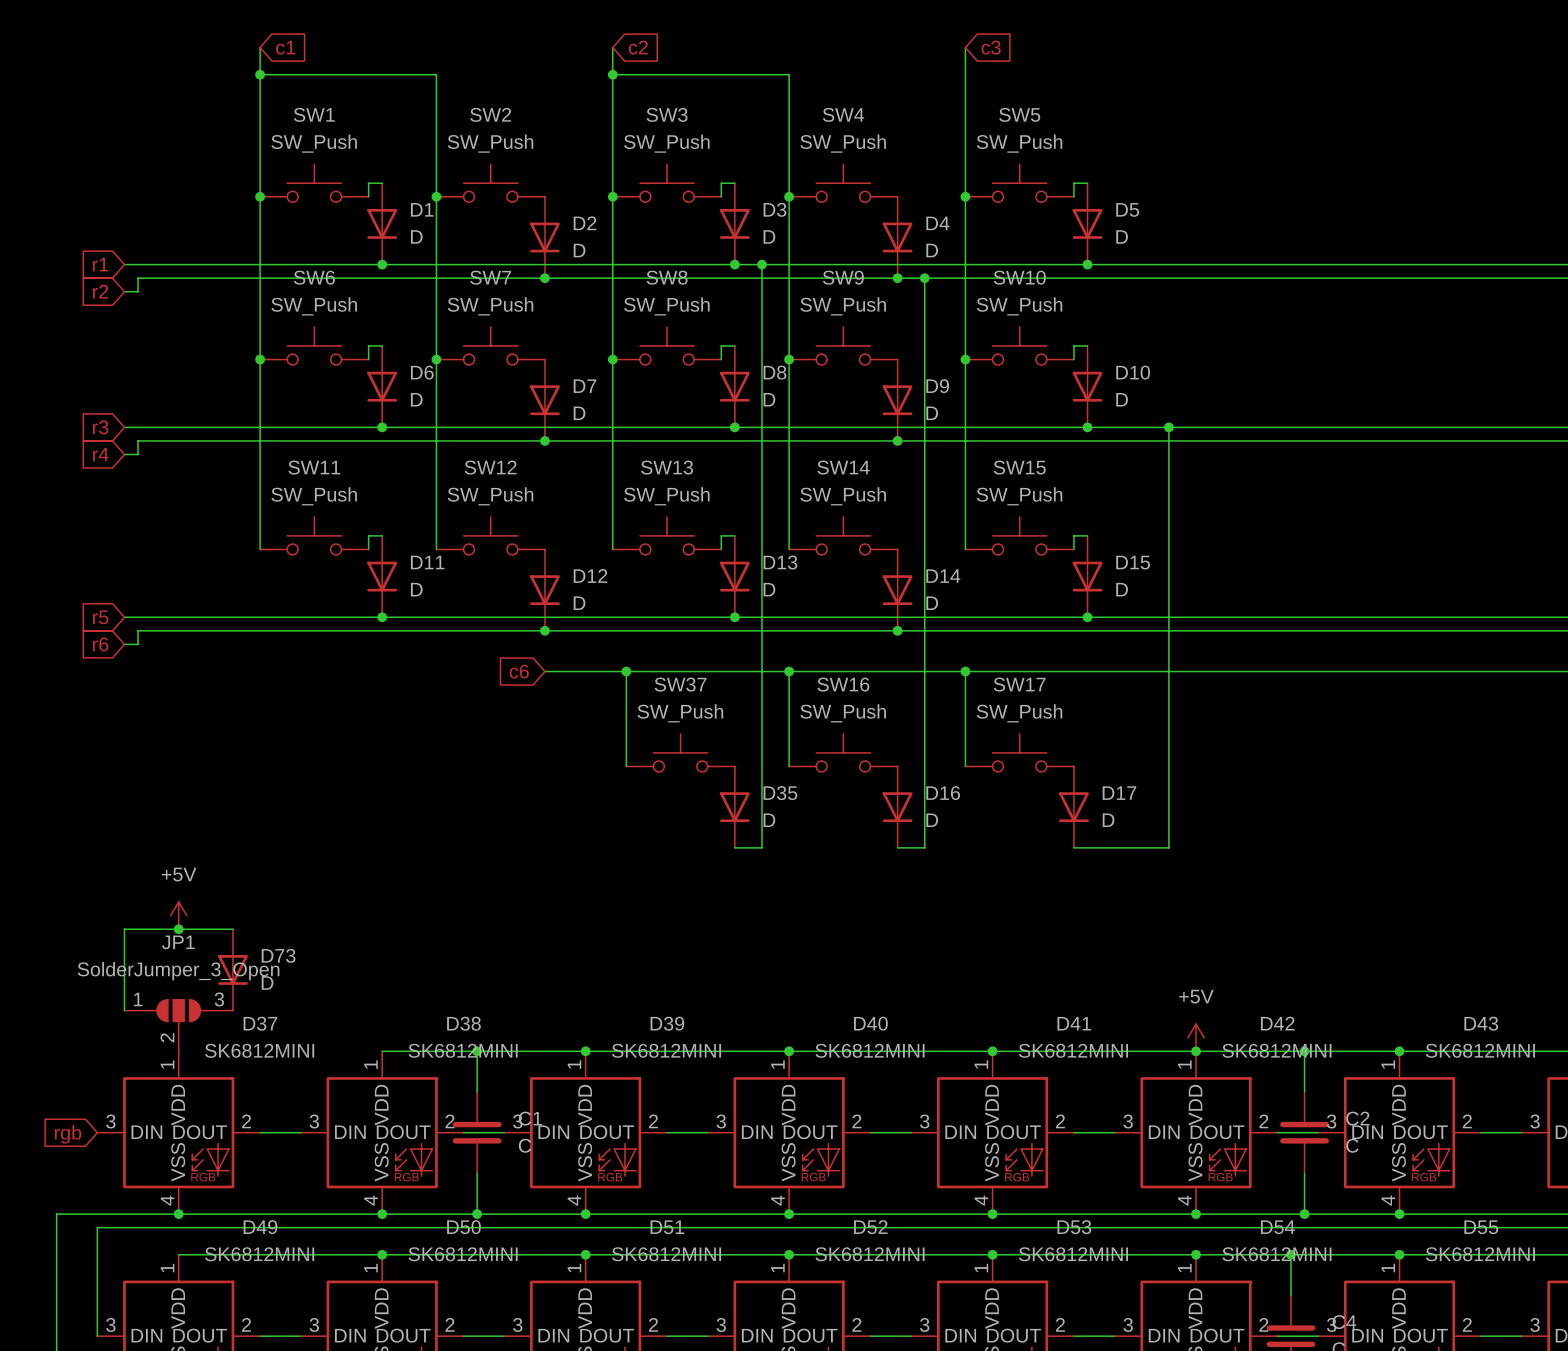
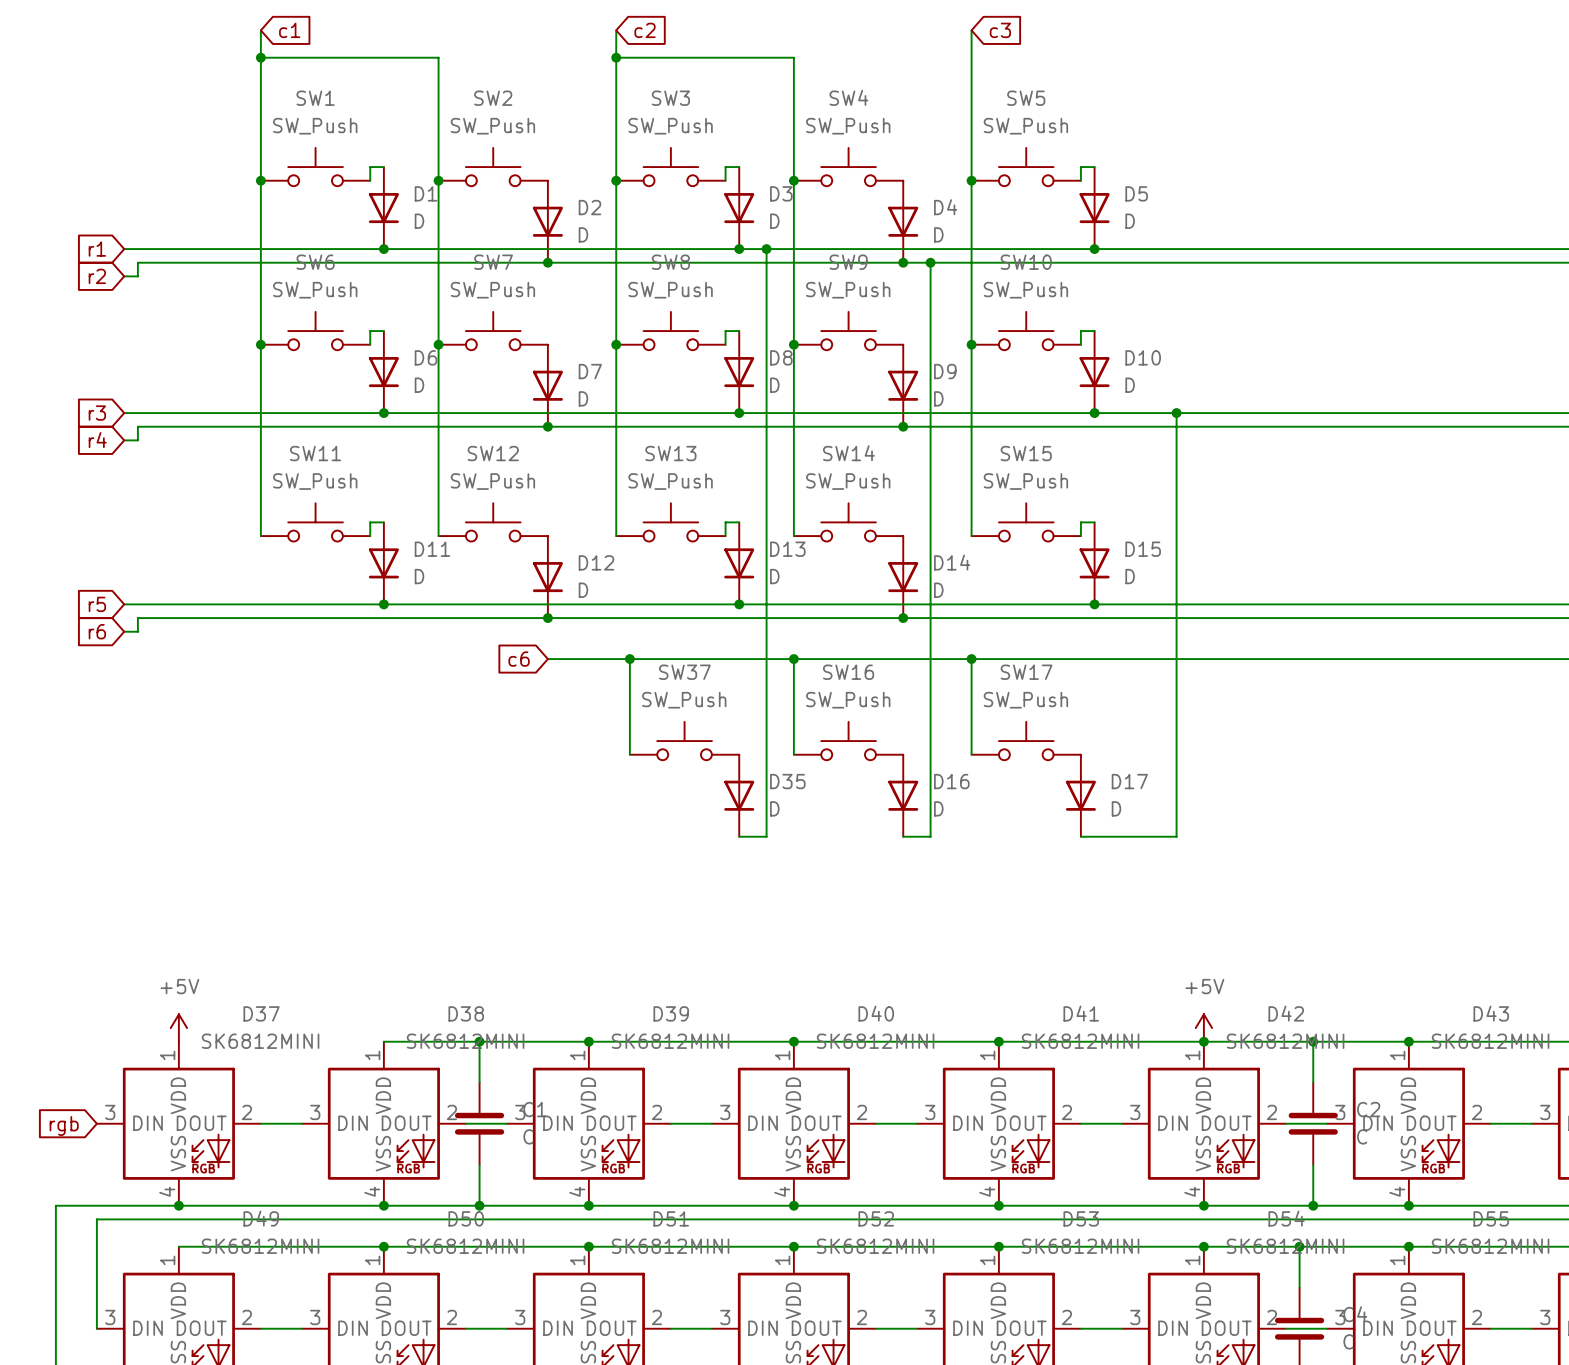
power symbol position: +5V (178, 915) -> +5V (178, 1028)
junction: (178, 929) -> none
wire: (232, 929) (124, 929) (124, 1010) -> none
D73: D (232, 969) -> none
JP1: SolderJumper_3_Open (178, 1025) -> none

